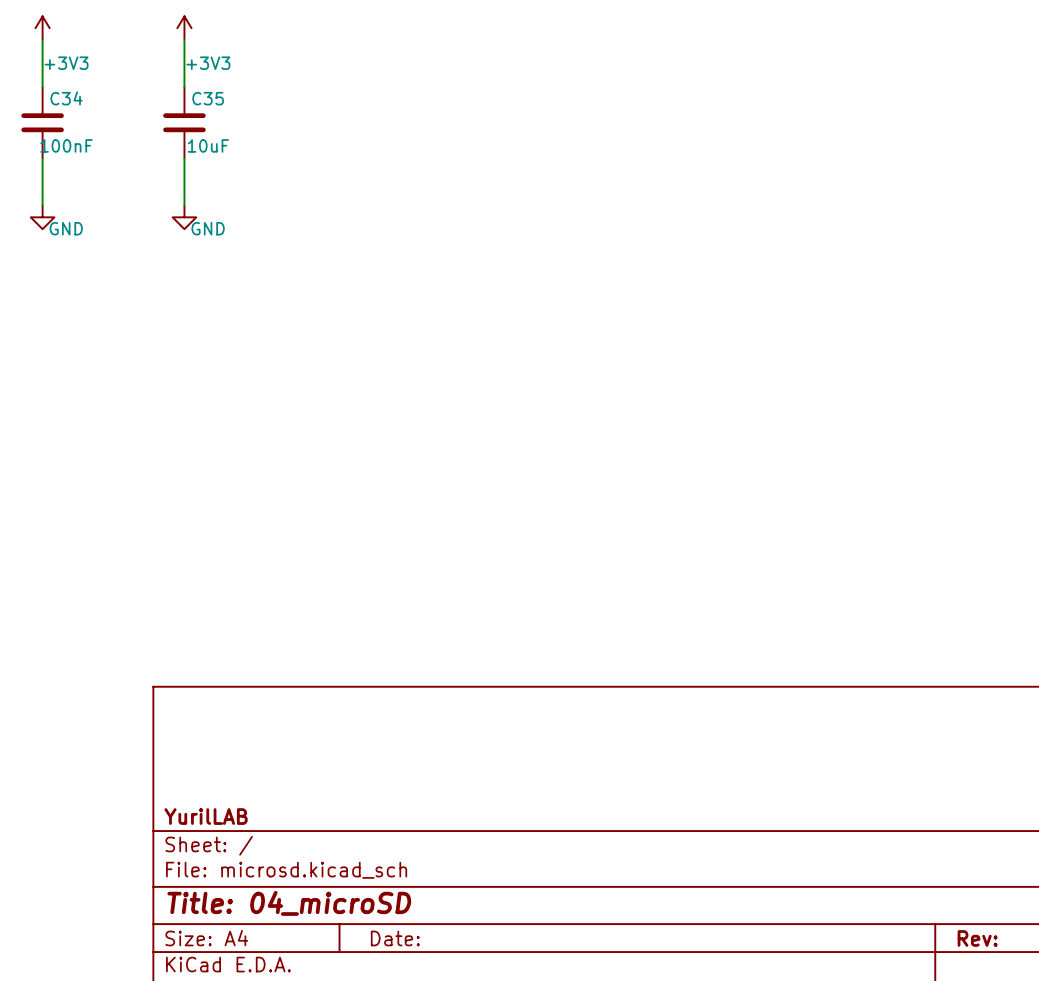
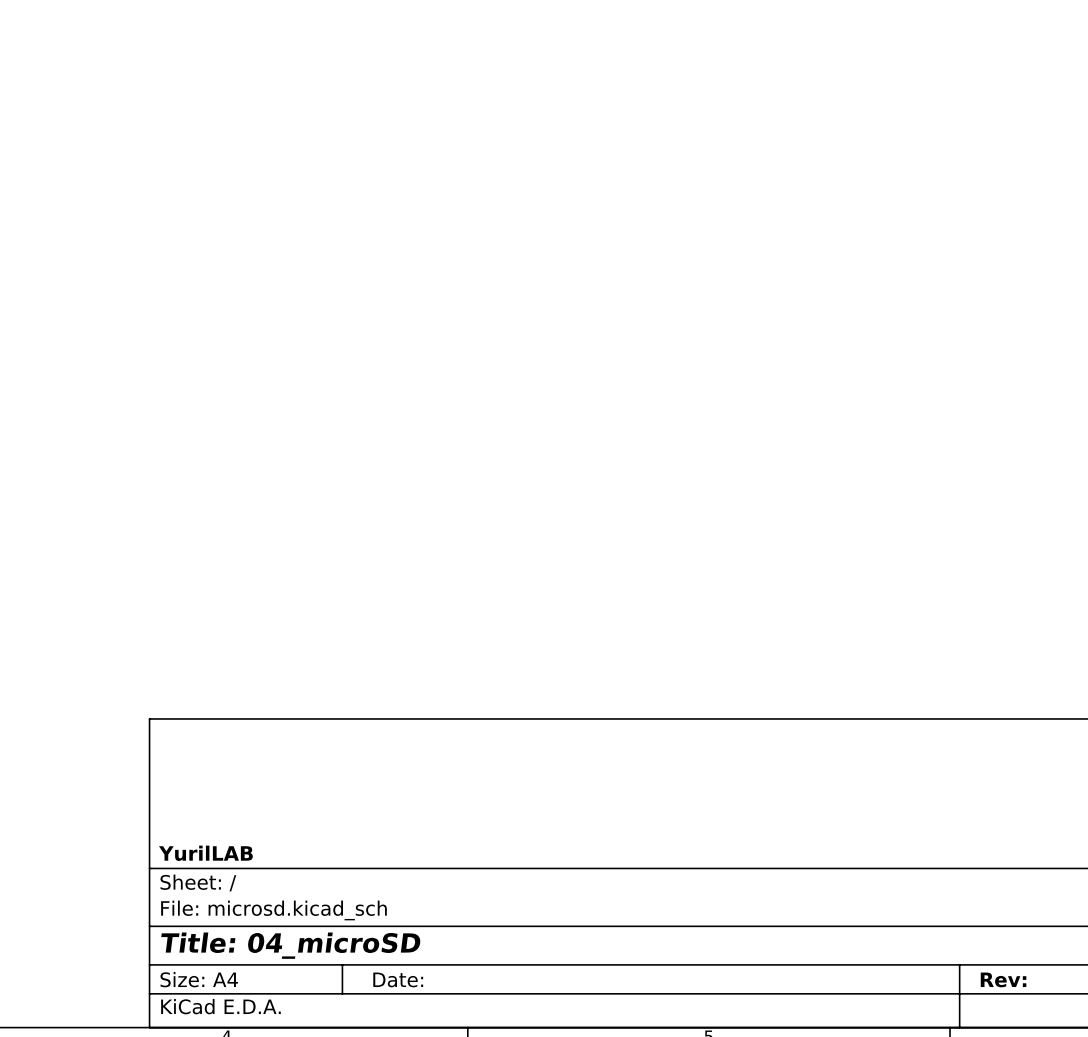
power symbol: +3V3 (42, 28) -> none
power symbol: +3V3 (184, 28) -> none
wire: (42, 40) (42, 87) -> none
wire: (184, 40) (184, 87) -> none
C34: 100nF (42, 122) -> none
C35: 10uF (184, 122) -> none
wire: (42, 158) (42, 205) -> none
wire: (184, 158) (184, 205) -> none
power symbol: GND (42, 217) -> none
power symbol: GND (184, 217) -> none

